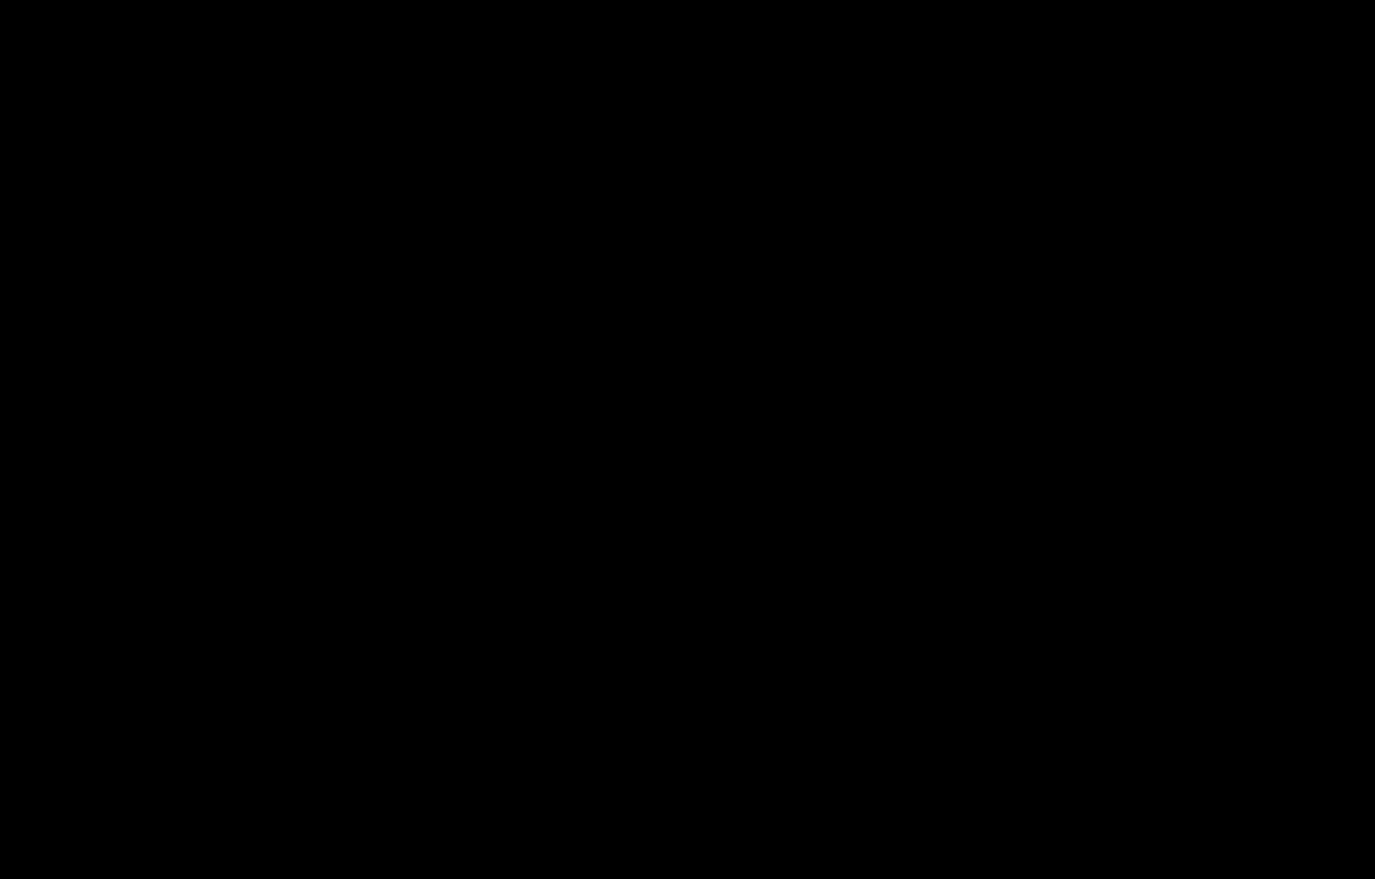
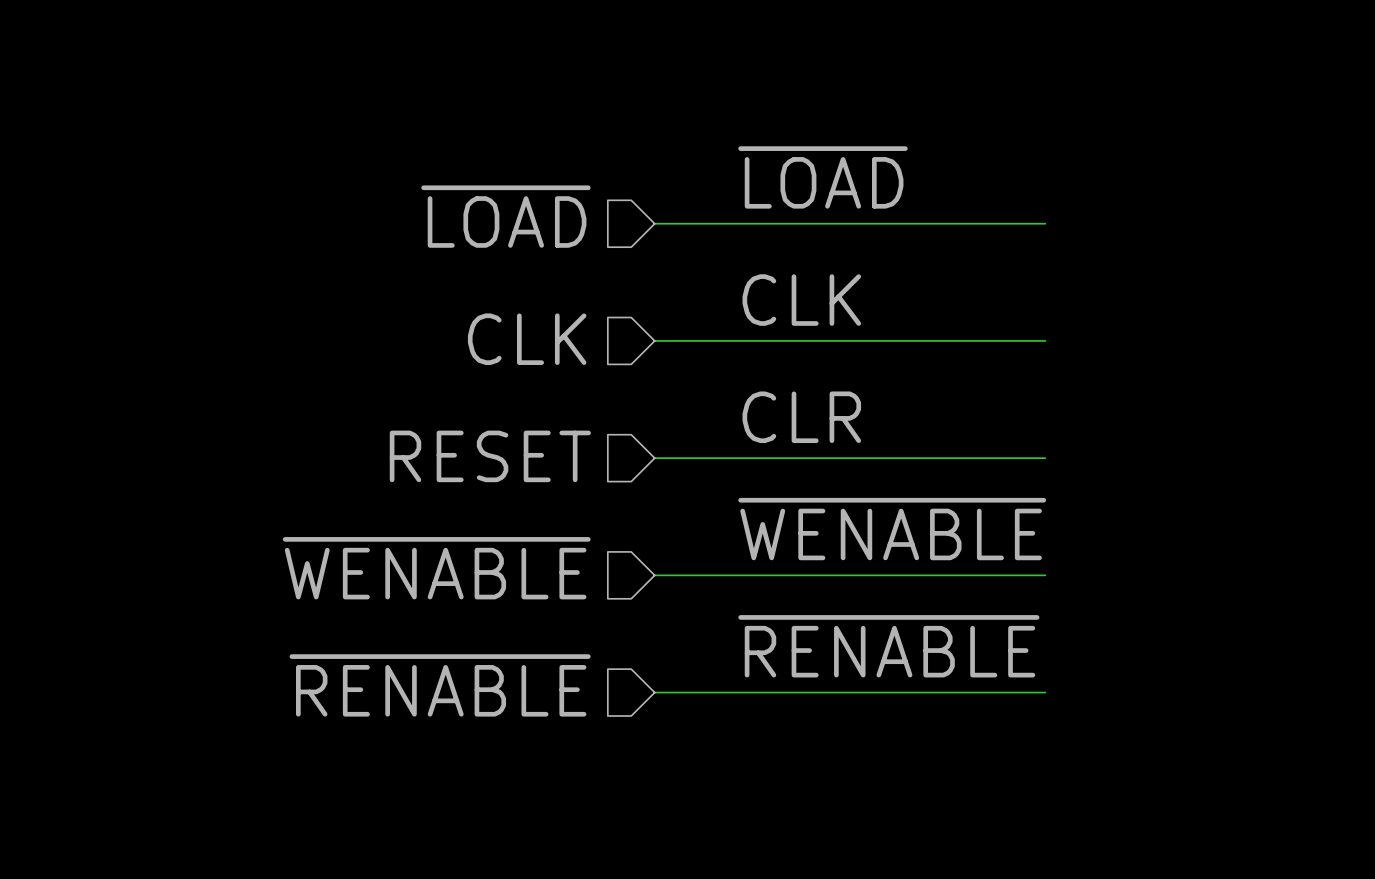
label: none -> ~{LOAD} (822, 177)
hierarchical label: none -> ~{LOAD} (505, 216)
wire: none -> (654, 223) (1045, 223)
label: none -> CLK (801, 300)
hierarchical label: none -> CLK (527, 339)
wire: none -> (654, 340) (1045, 340)
label: none -> CLR (801, 417)
hierarchical label: none -> RESET (490, 456)
wire: none -> (654, 458) (1045, 458)
label: none -> ~{WENABLE} (892, 529)
hierarchical label: none -> ~{WENABLE} (436, 568)
wire: none -> (654, 575) (1045, 575)
label: none -> ~{RENABLE} (888, 646)
hierarchical label: none -> ~{RENABLE} (440, 685)
wire: none -> (654, 692) (1045, 692)

